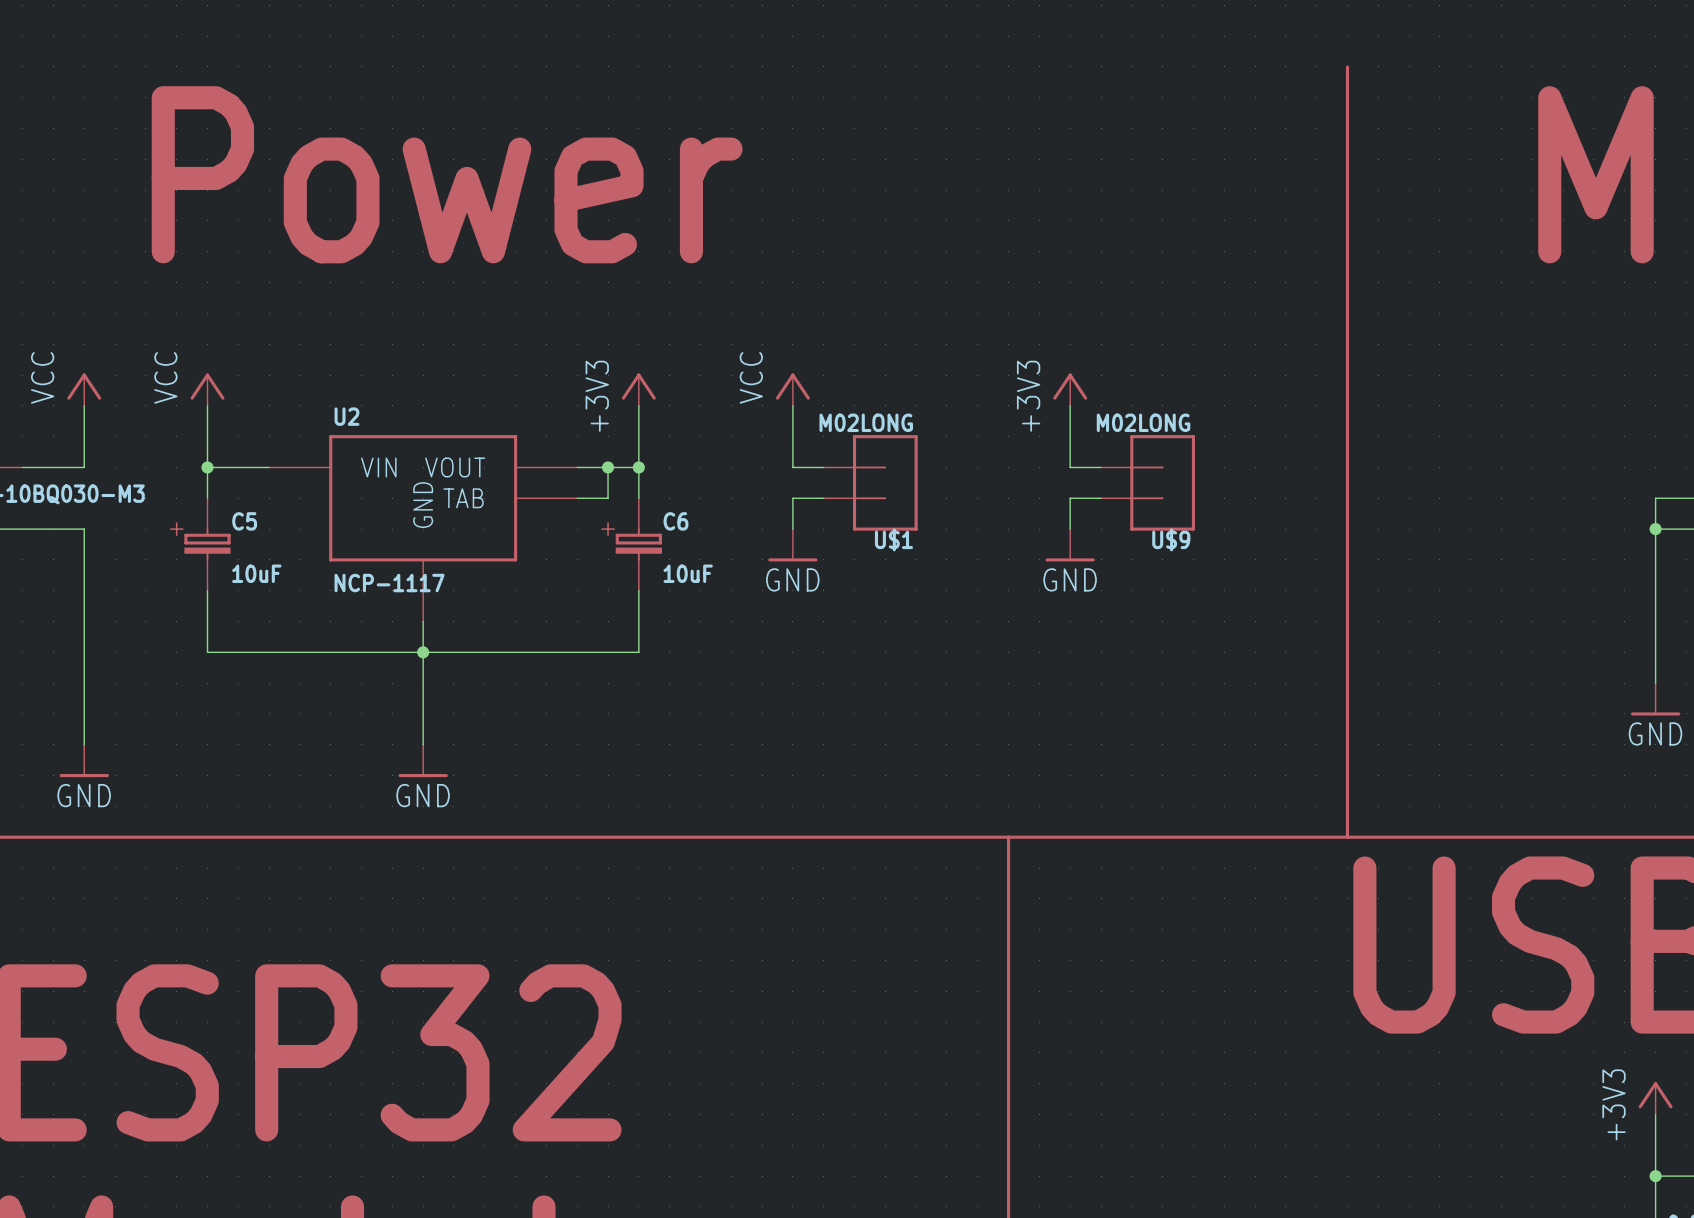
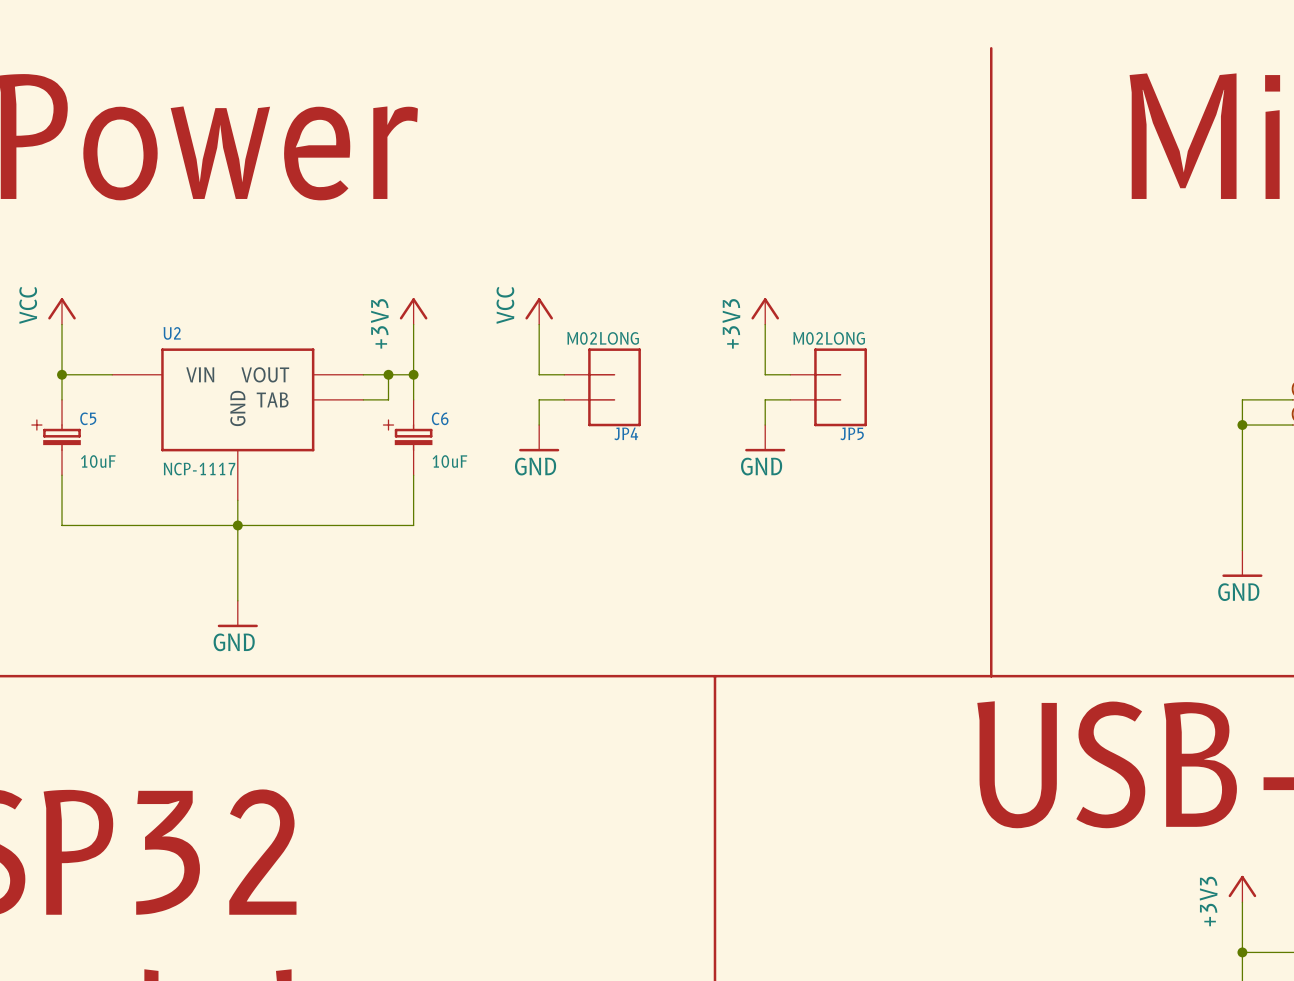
U$1 name: U$1 (893, 539) -> JP4 (626, 433)
U$9 name: U$9 (1171, 539) -> JP5 (852, 433)

